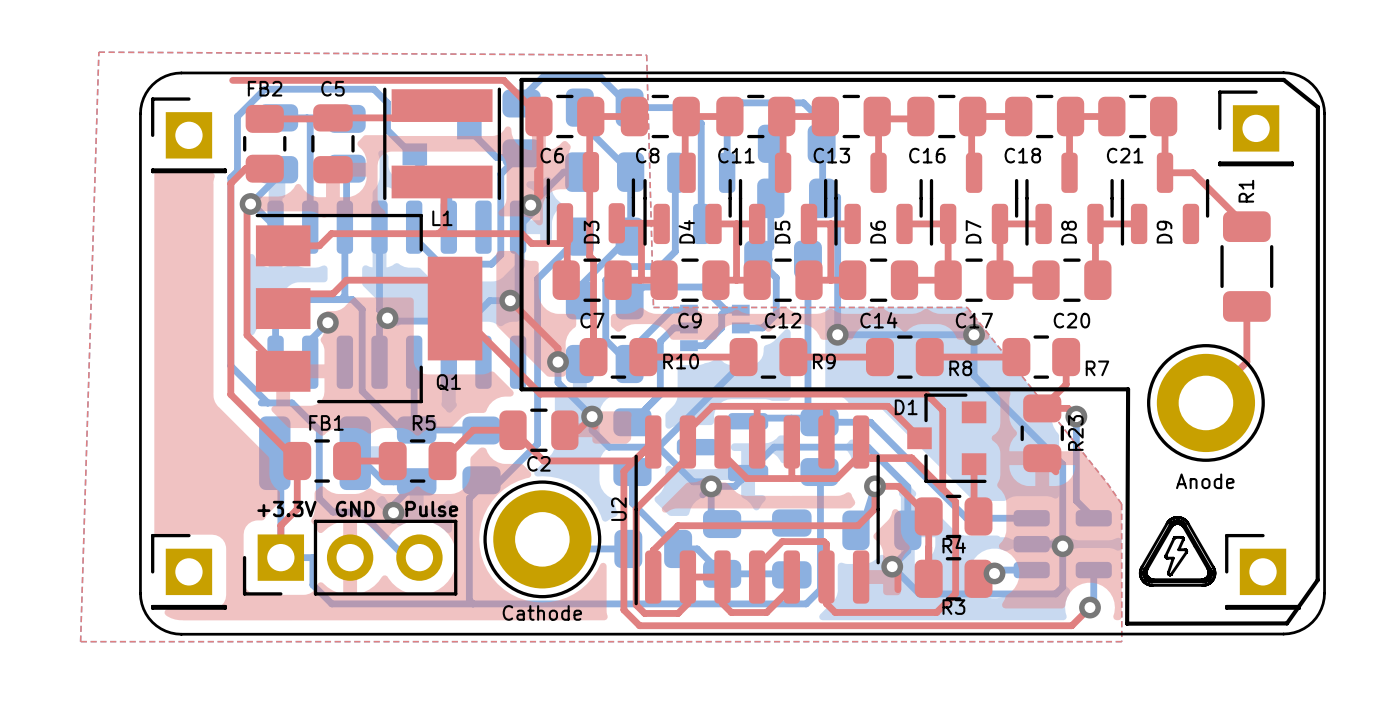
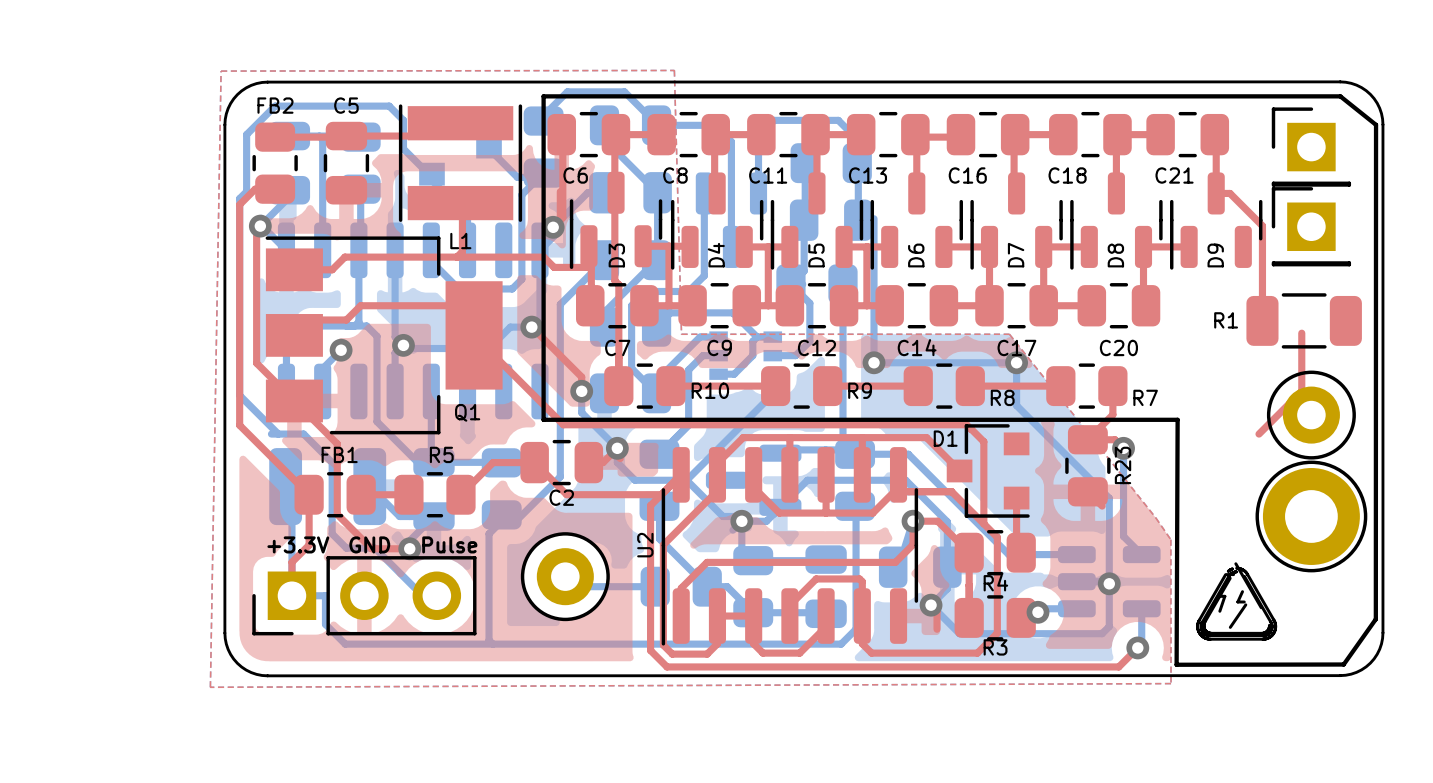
top zone outline: (646, 55) (98, 52) (80, 641) (1121, 641) -> (674, 70) (221, 71) (210, 687) (1171, 683)
top track: (232, 80) (503, 80) (539, 116) -> none
board edge: (1324, 113) (1321, 98) (1312, 84) (1299, 75) (1283, 72) (181, 72) (170, 74) (156, 81) (145, 93) (140, 108) (140, 593) (143, 608) (148, 618) (165, 631) (181, 634) (1283, 634) -> (1382, 131) (1381, 113) (1374, 98) (1356, 85) (1340, 81) (267, 82) (251, 85) (241, 90) (230, 103) (225, 119) (224, 633) (230, 654) (246, 670) (267, 675) (1340, 675)
part: (188, 135) -> none
top track: (1178, 172) (1192, 172) (1247, 227) -> (1230, 193) (1262, 225) (1262, 320)
R1 name position: R1 (1246, 191) -> R1 (1226, 320)
R1 rotation: 0° (1246, 266) -> 90° clockwise (1304, 320)
top track: none -> (294, 400) (337, 443) (337, 514) (371, 548) (409, 548)
part: none -> (1311, 415)
part: Anode (1205, 402) -> none
part footprint: [483, 480, 602, 599] -> [520, 532, 610, 622]
part: none -> (1311, 516)
line: (1177, 517) (1187, 522) (1213, 567) (1214, 573) (1213, 579) -> (1236, 568) (1246, 573) (1273, 620) (1275, 626) (1273, 632)
line: (1177, 520) (1170, 525) (1144, 569) (1144, 577) -> (1236, 571) (1228, 576) (1202, 622) (1202, 631)
line: (1167, 523) (1141, 568) (1141, 579) (1150, 585) (1202, 585) -> none
line: (1185, 525) (1210, 569) (1210, 577) (1203, 581) (1152, 581) -> (1244, 576) (1271, 622) (1270, 631) (1263, 635) (1210, 635)
line: (1171, 527) (1147, 569) -> (1230, 578) (1204, 622)
line: (1174, 538) (1165, 555) -> (1225, 574) (1198, 621) (1199, 632) (1208, 639) (1262, 639)
line: (1183, 539) (1178, 549) (1184, 549) -> (1242, 591) (1237, 601) (1244, 601)
line: (1186, 552) (1171, 574) -> (1245, 604) (1230, 627)
part: (188, 571) -> none
part position: (1263, 571) -> (1311, 226)
line: (1153, 579) (1201, 579) -> (1211, 633) (1262, 633)
part value: Cathode (542, 612) -> none

